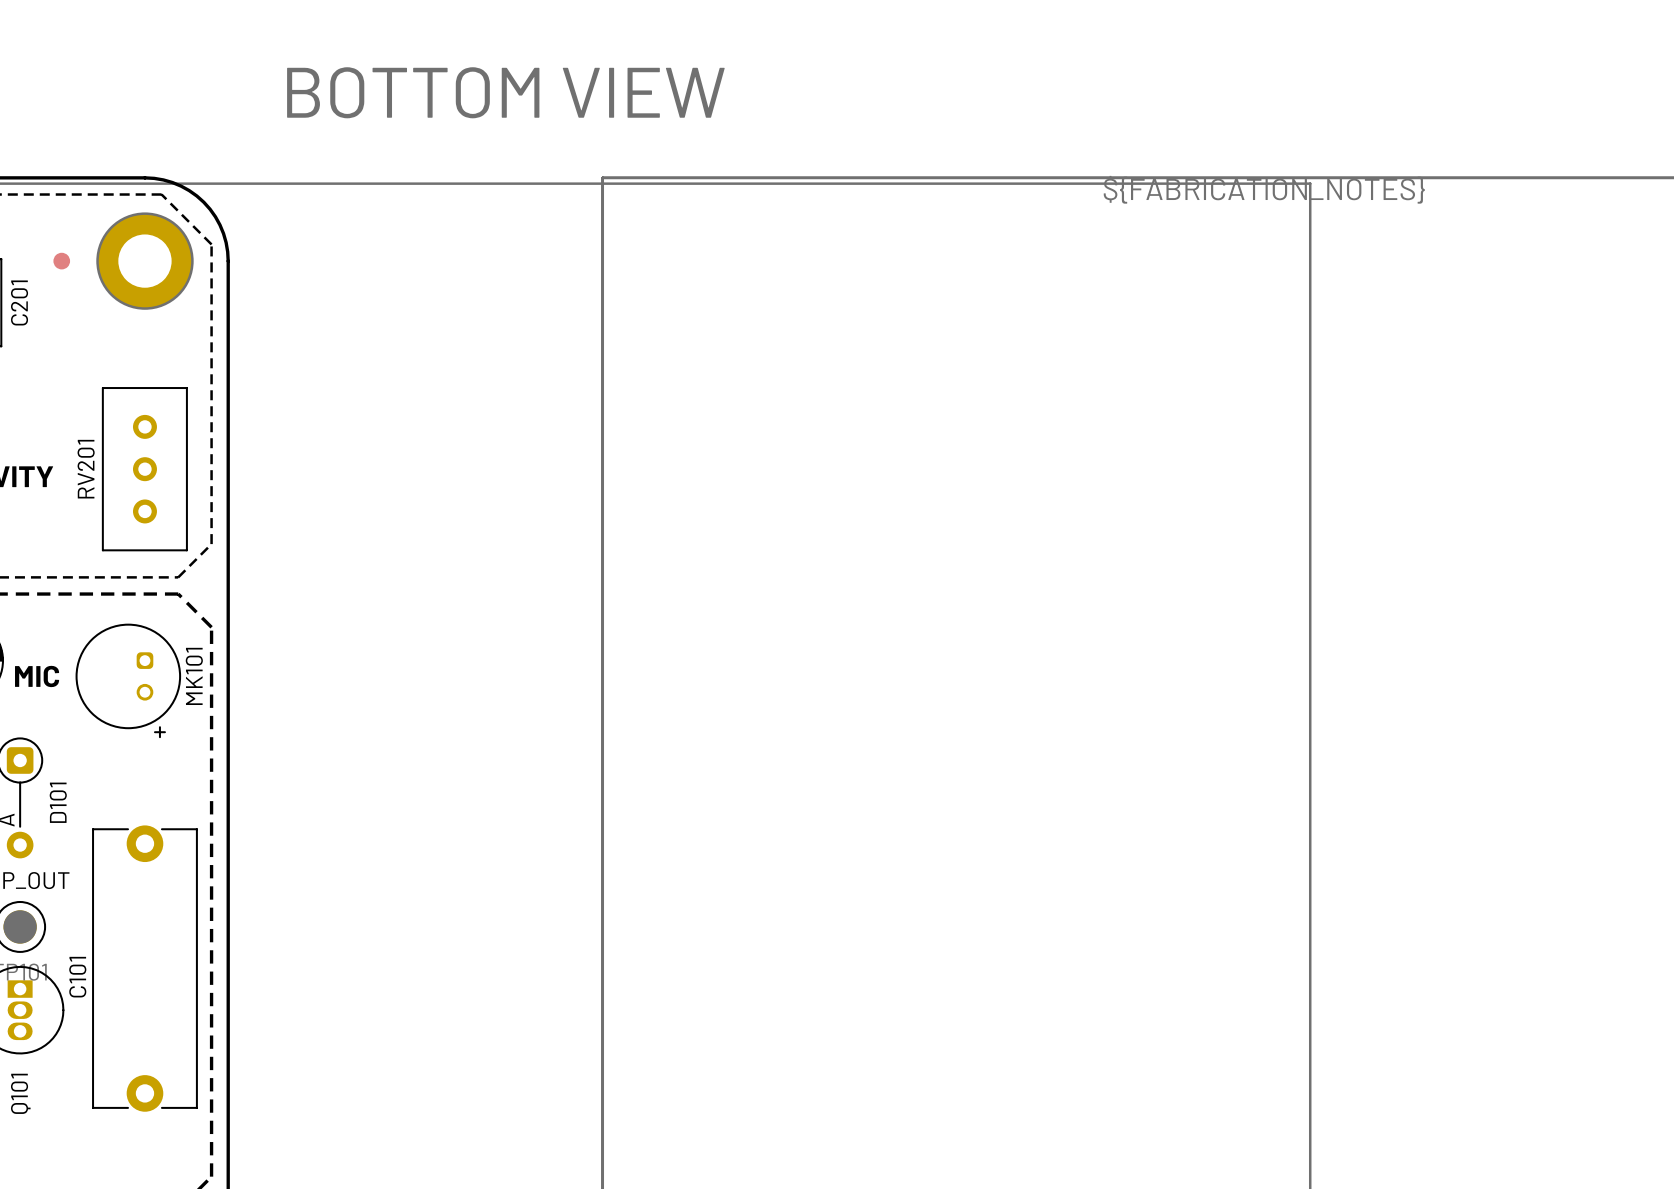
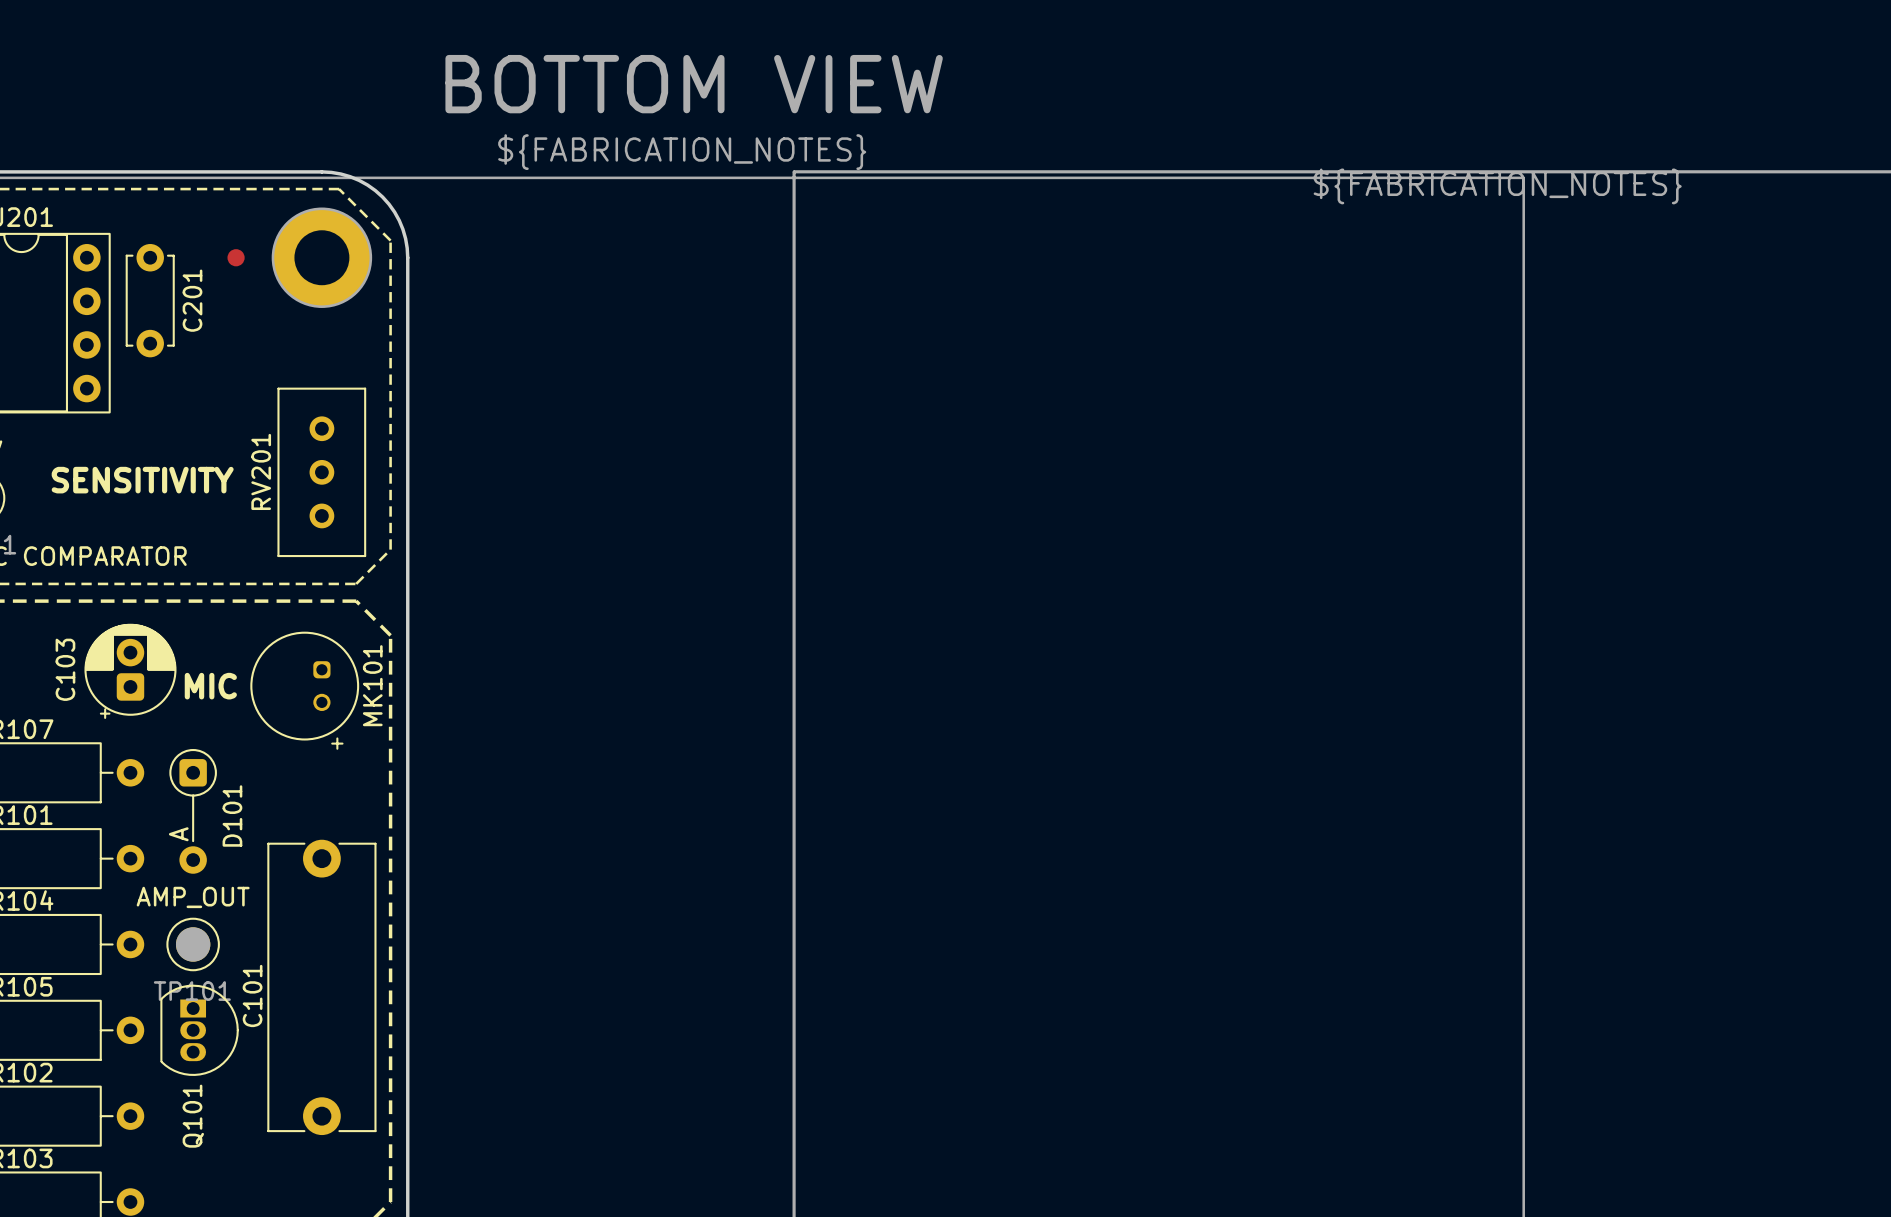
text: none -> ${FABRICATION_NOTES} (682, 152)

